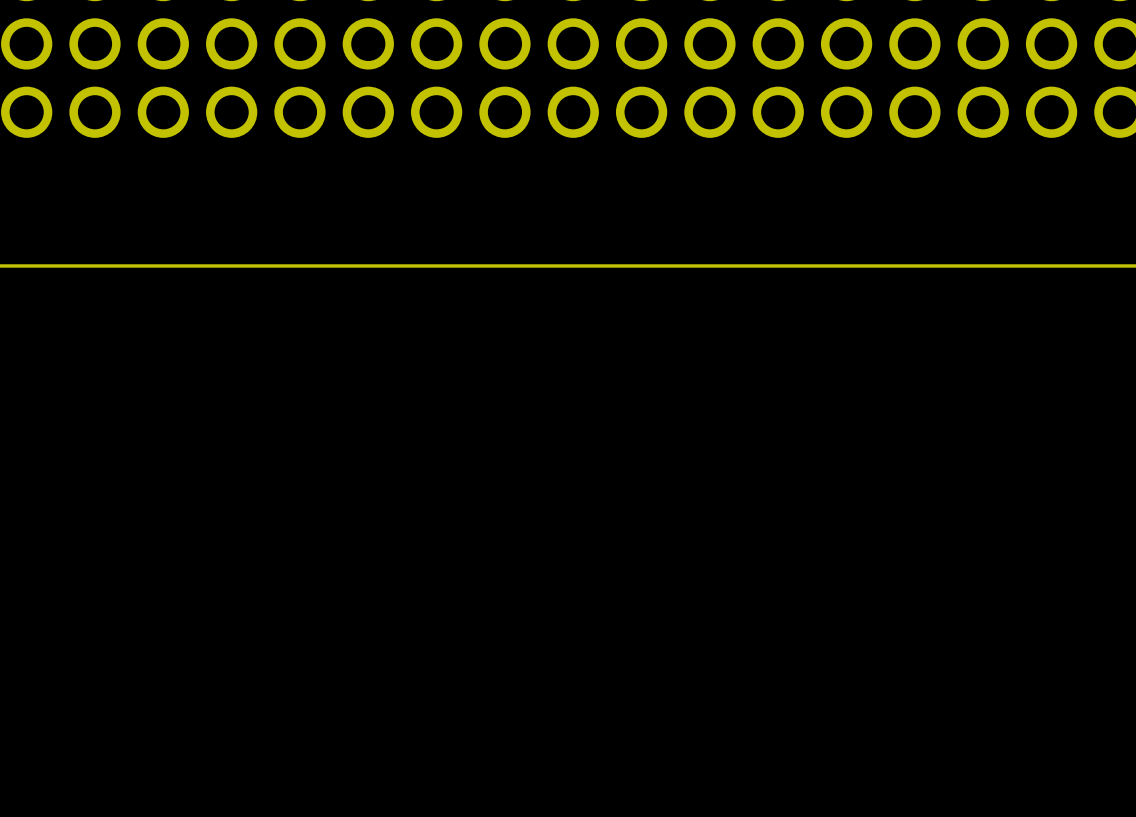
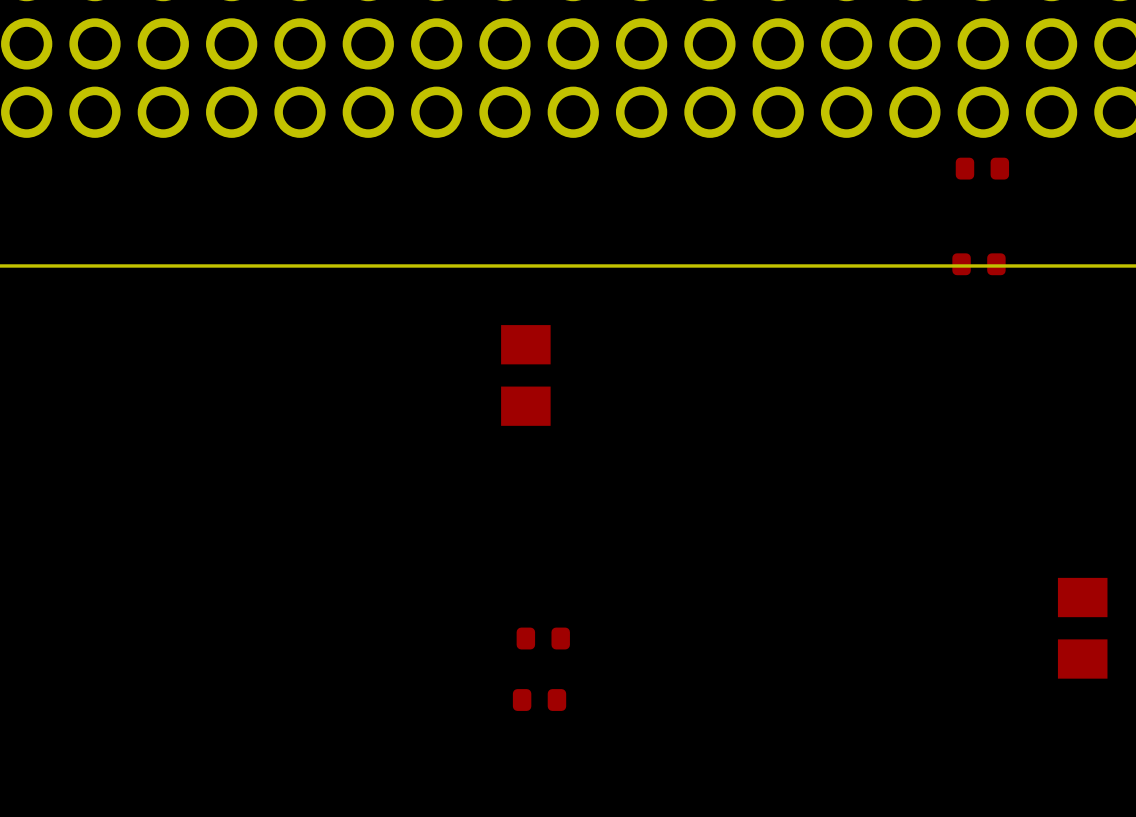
part: none -> (982, 168)
part: none -> (978, 264)
part: none -> (525, 375)
part: none -> (1082, 628)
part: none -> (543, 638)
part: none -> (539, 700)

